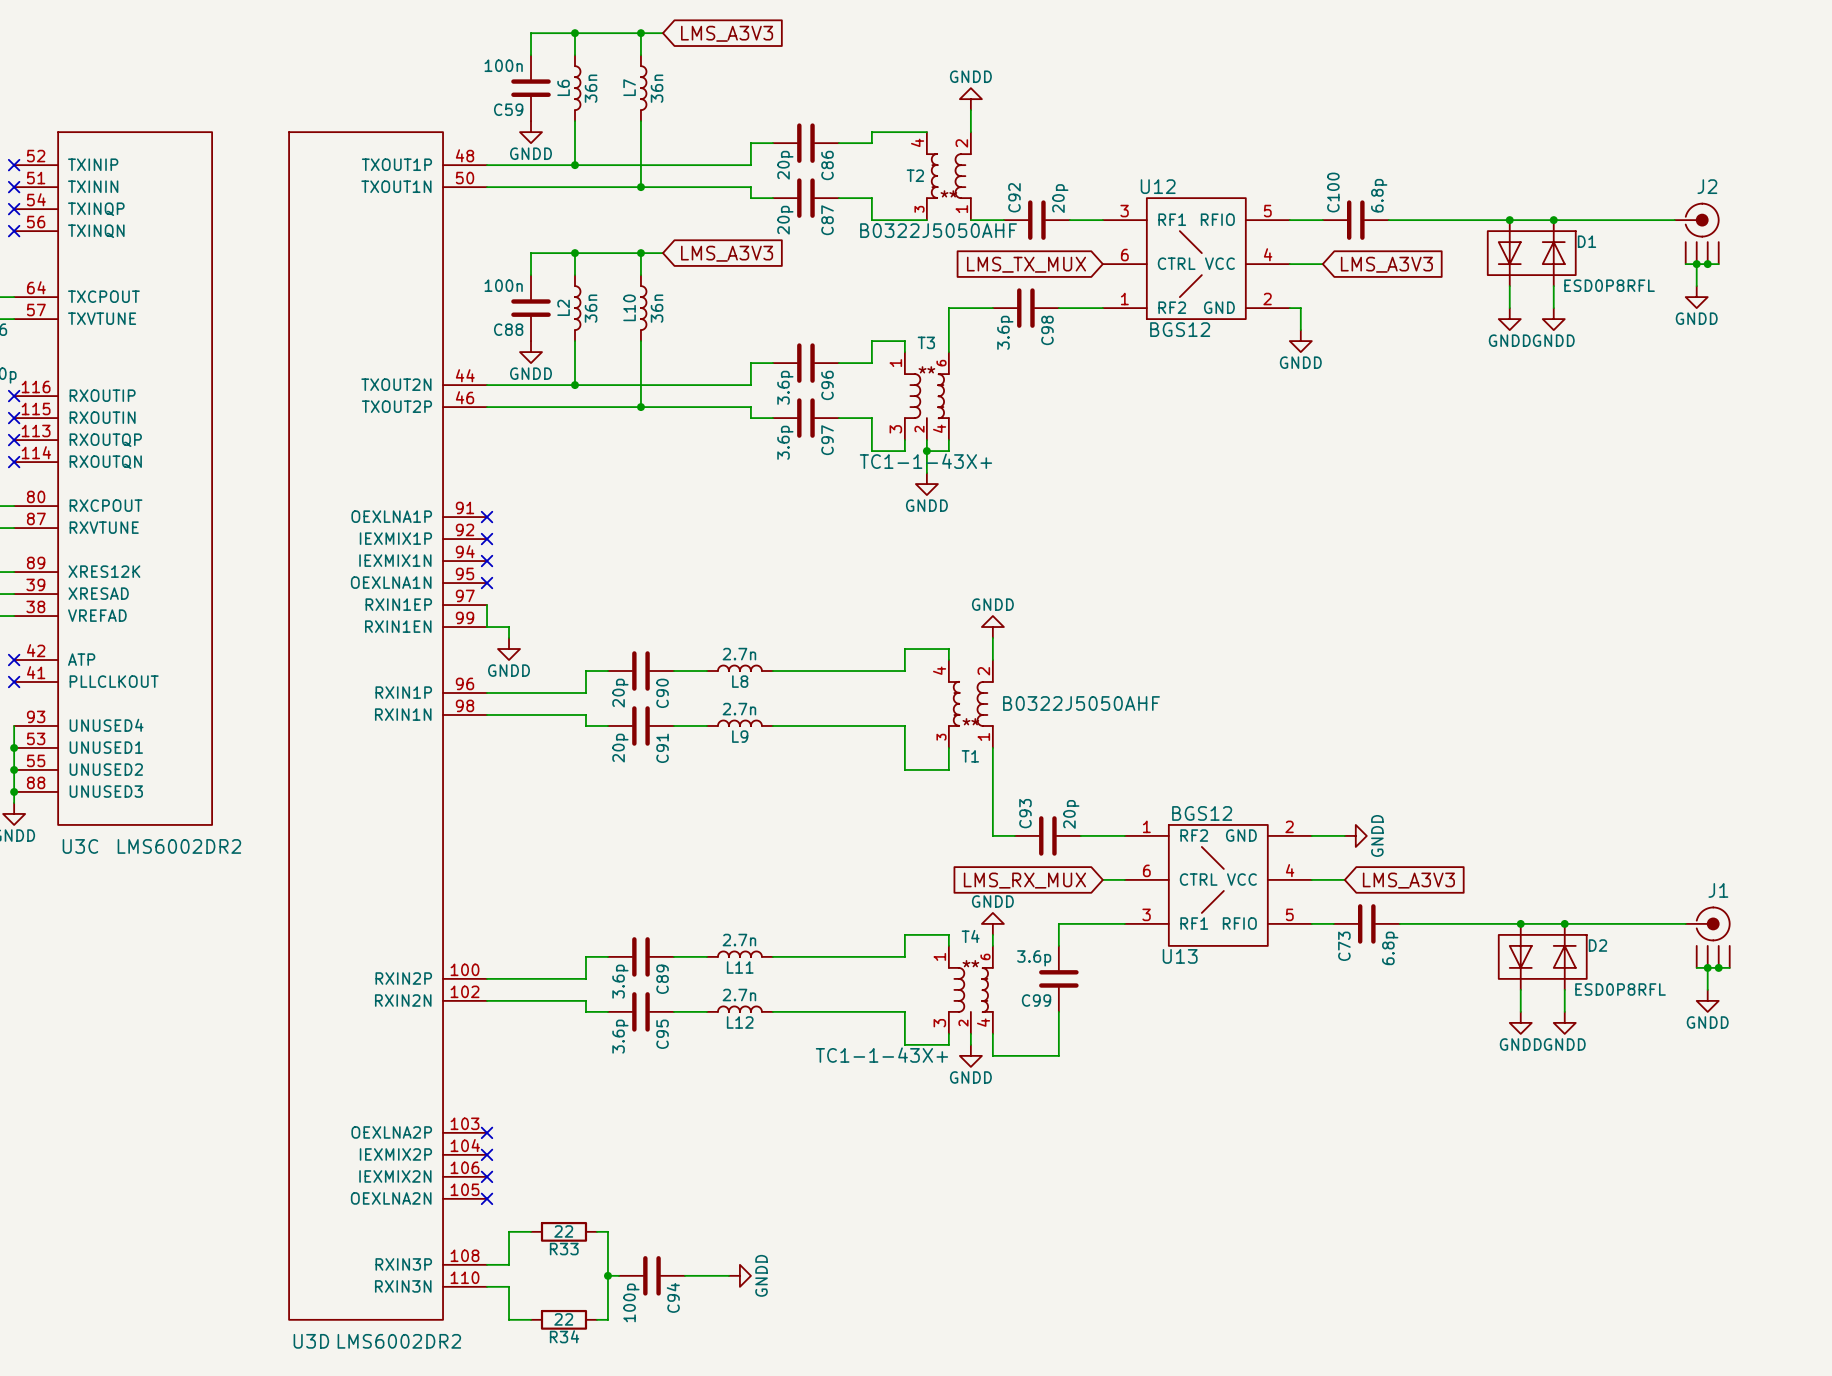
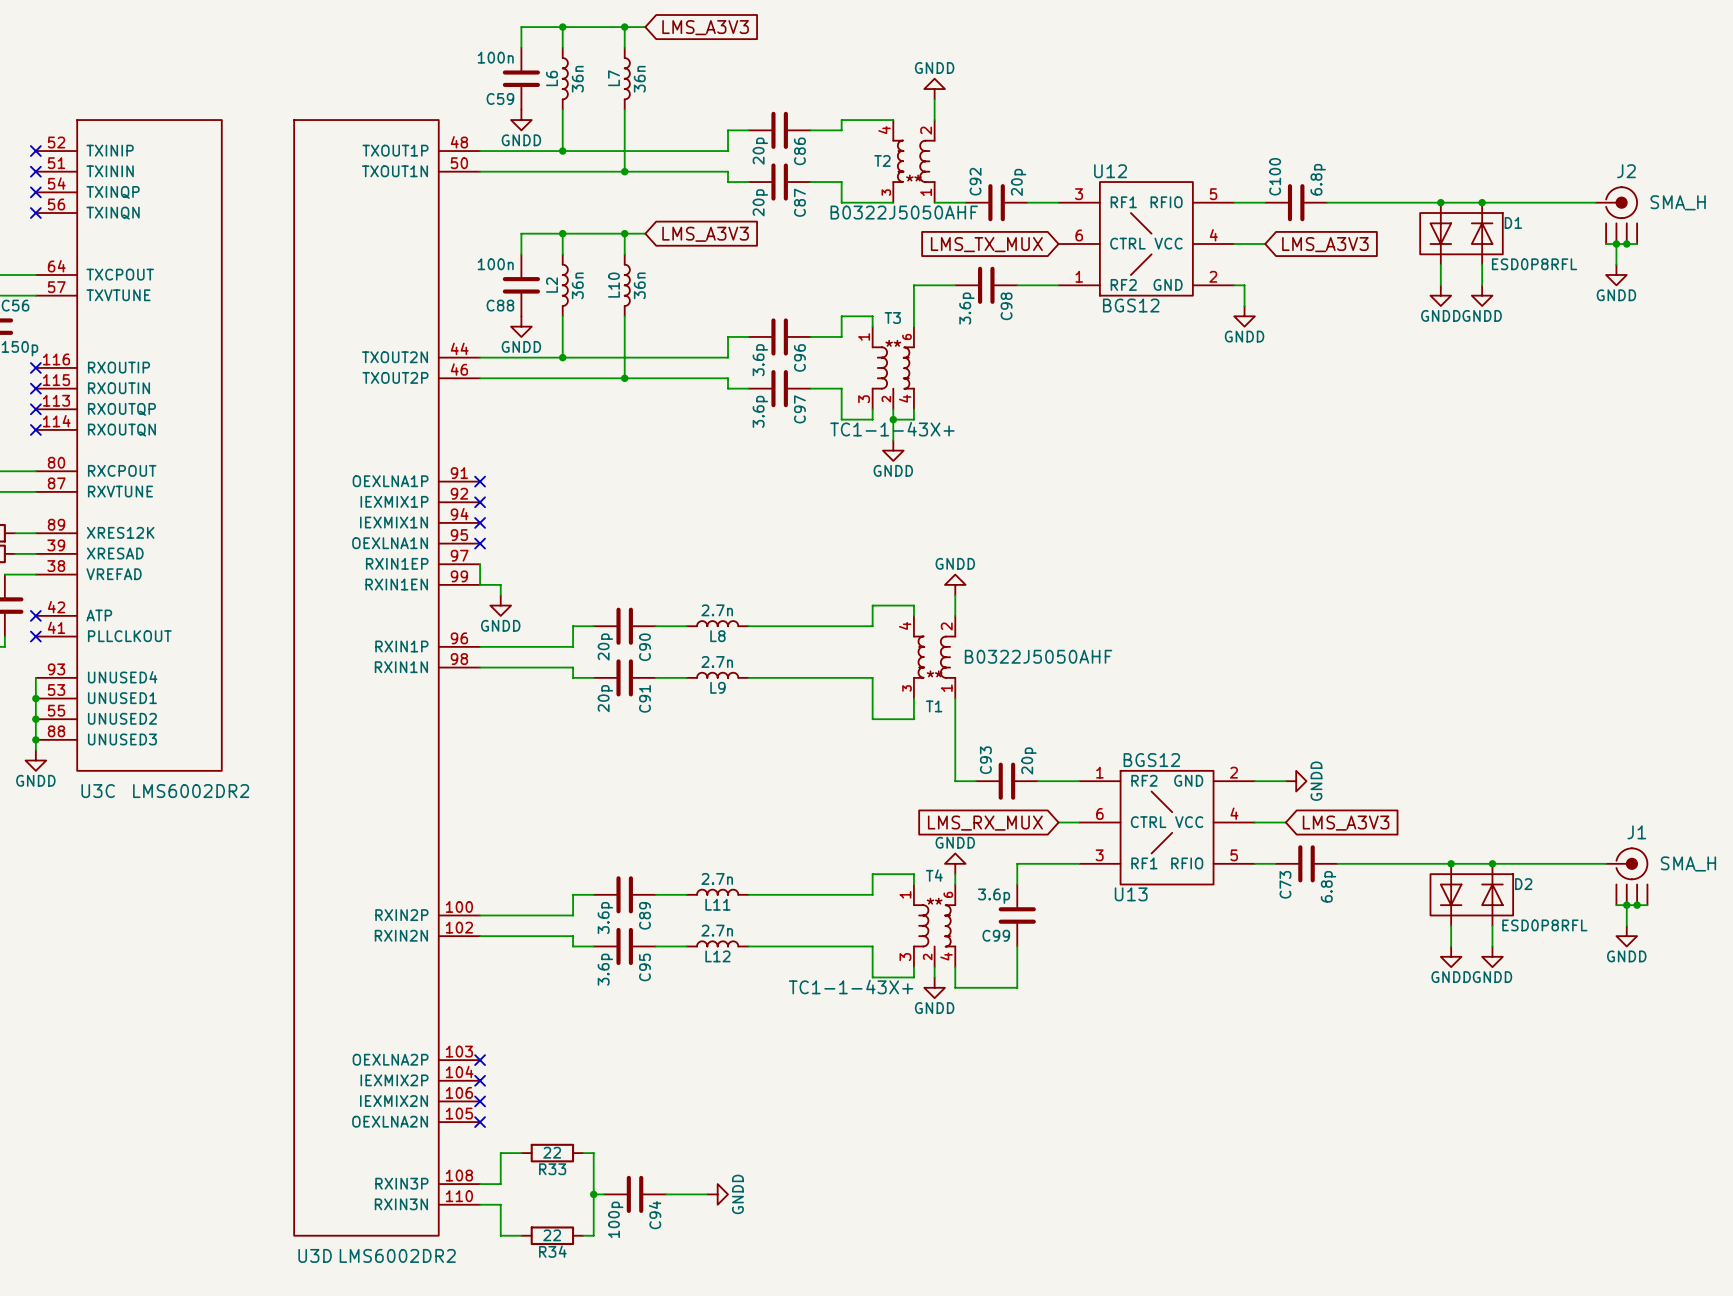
J2 text: none -> SMA_H (1678, 202)
J1 text: none -> SMA_H (1688, 863)

